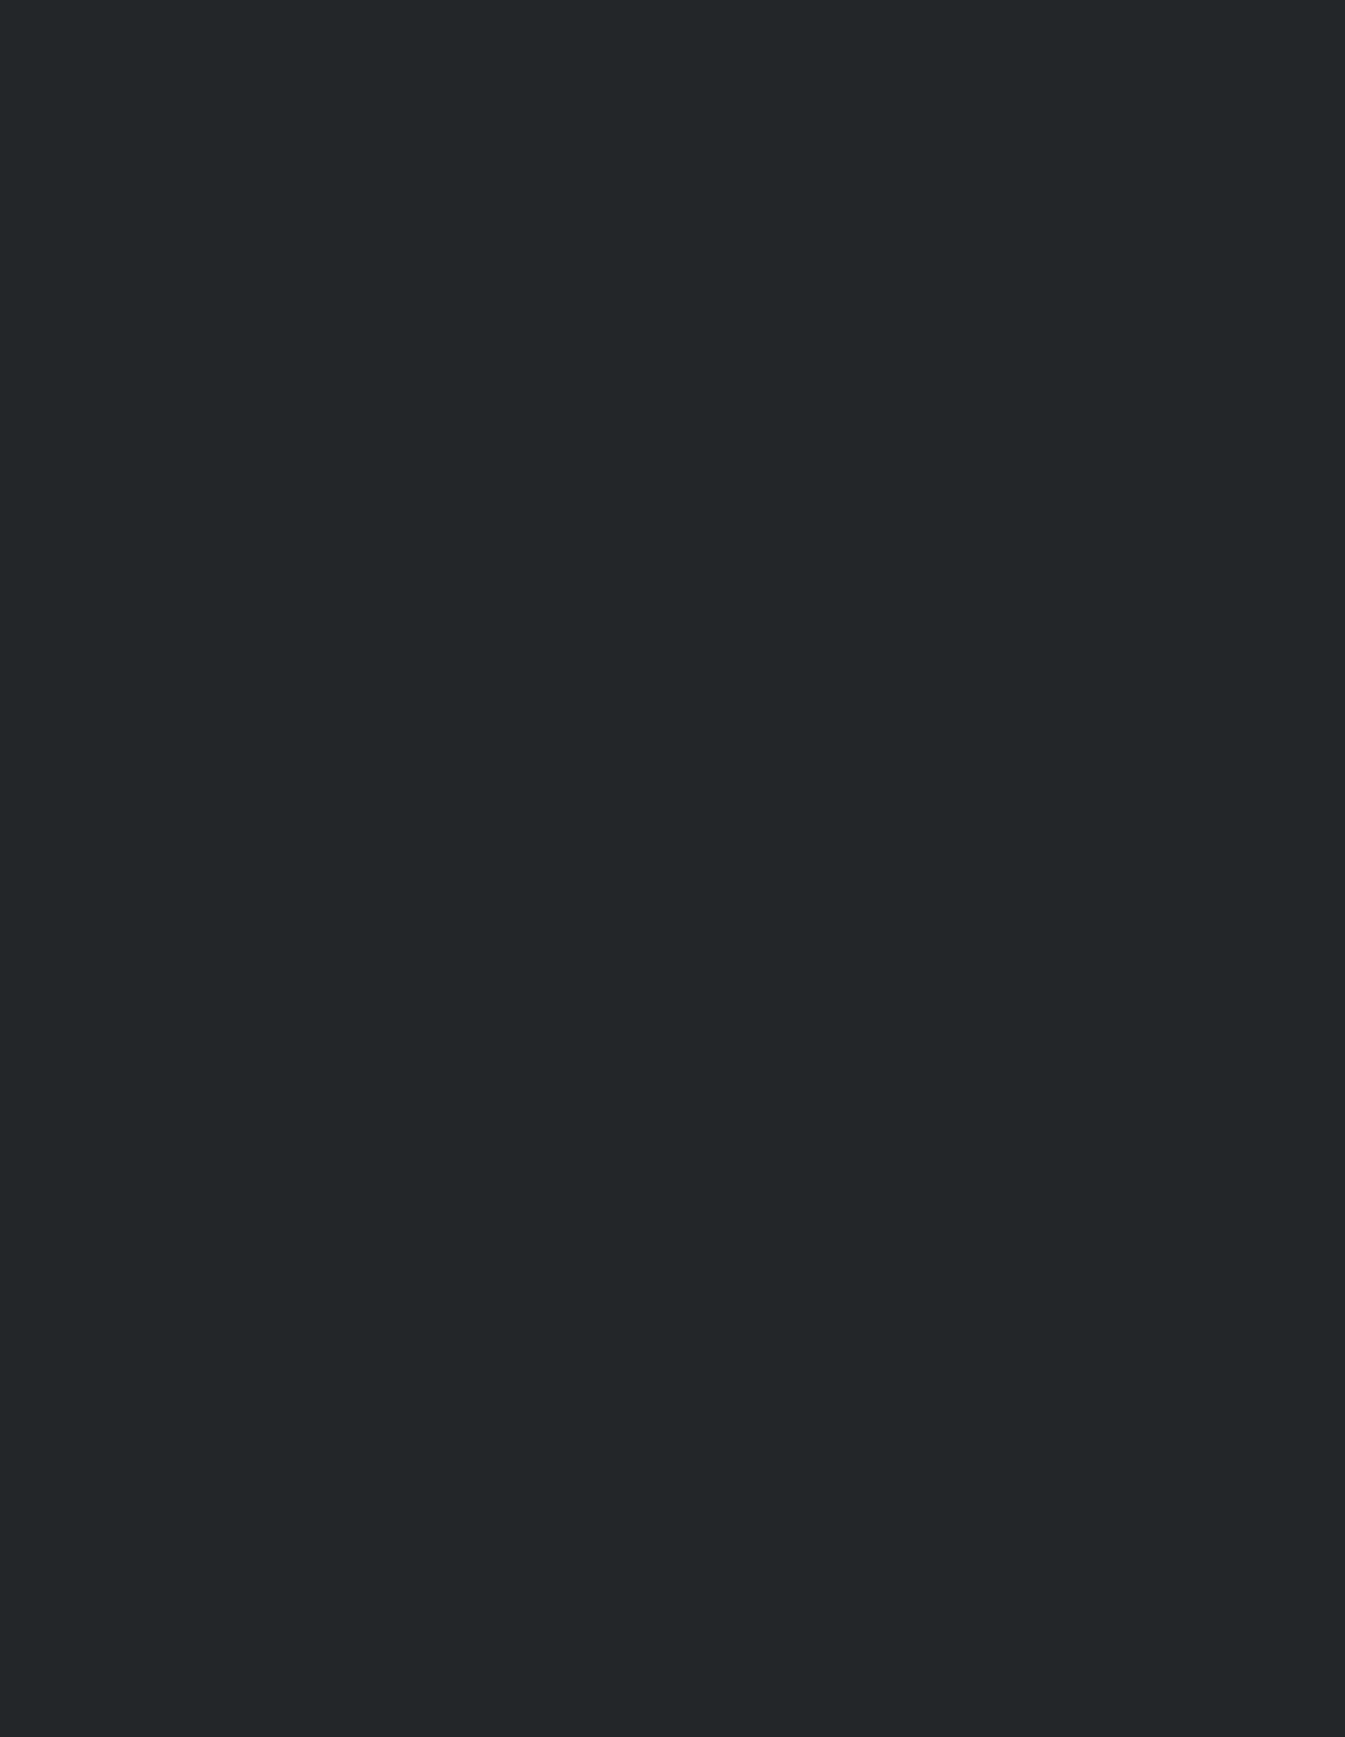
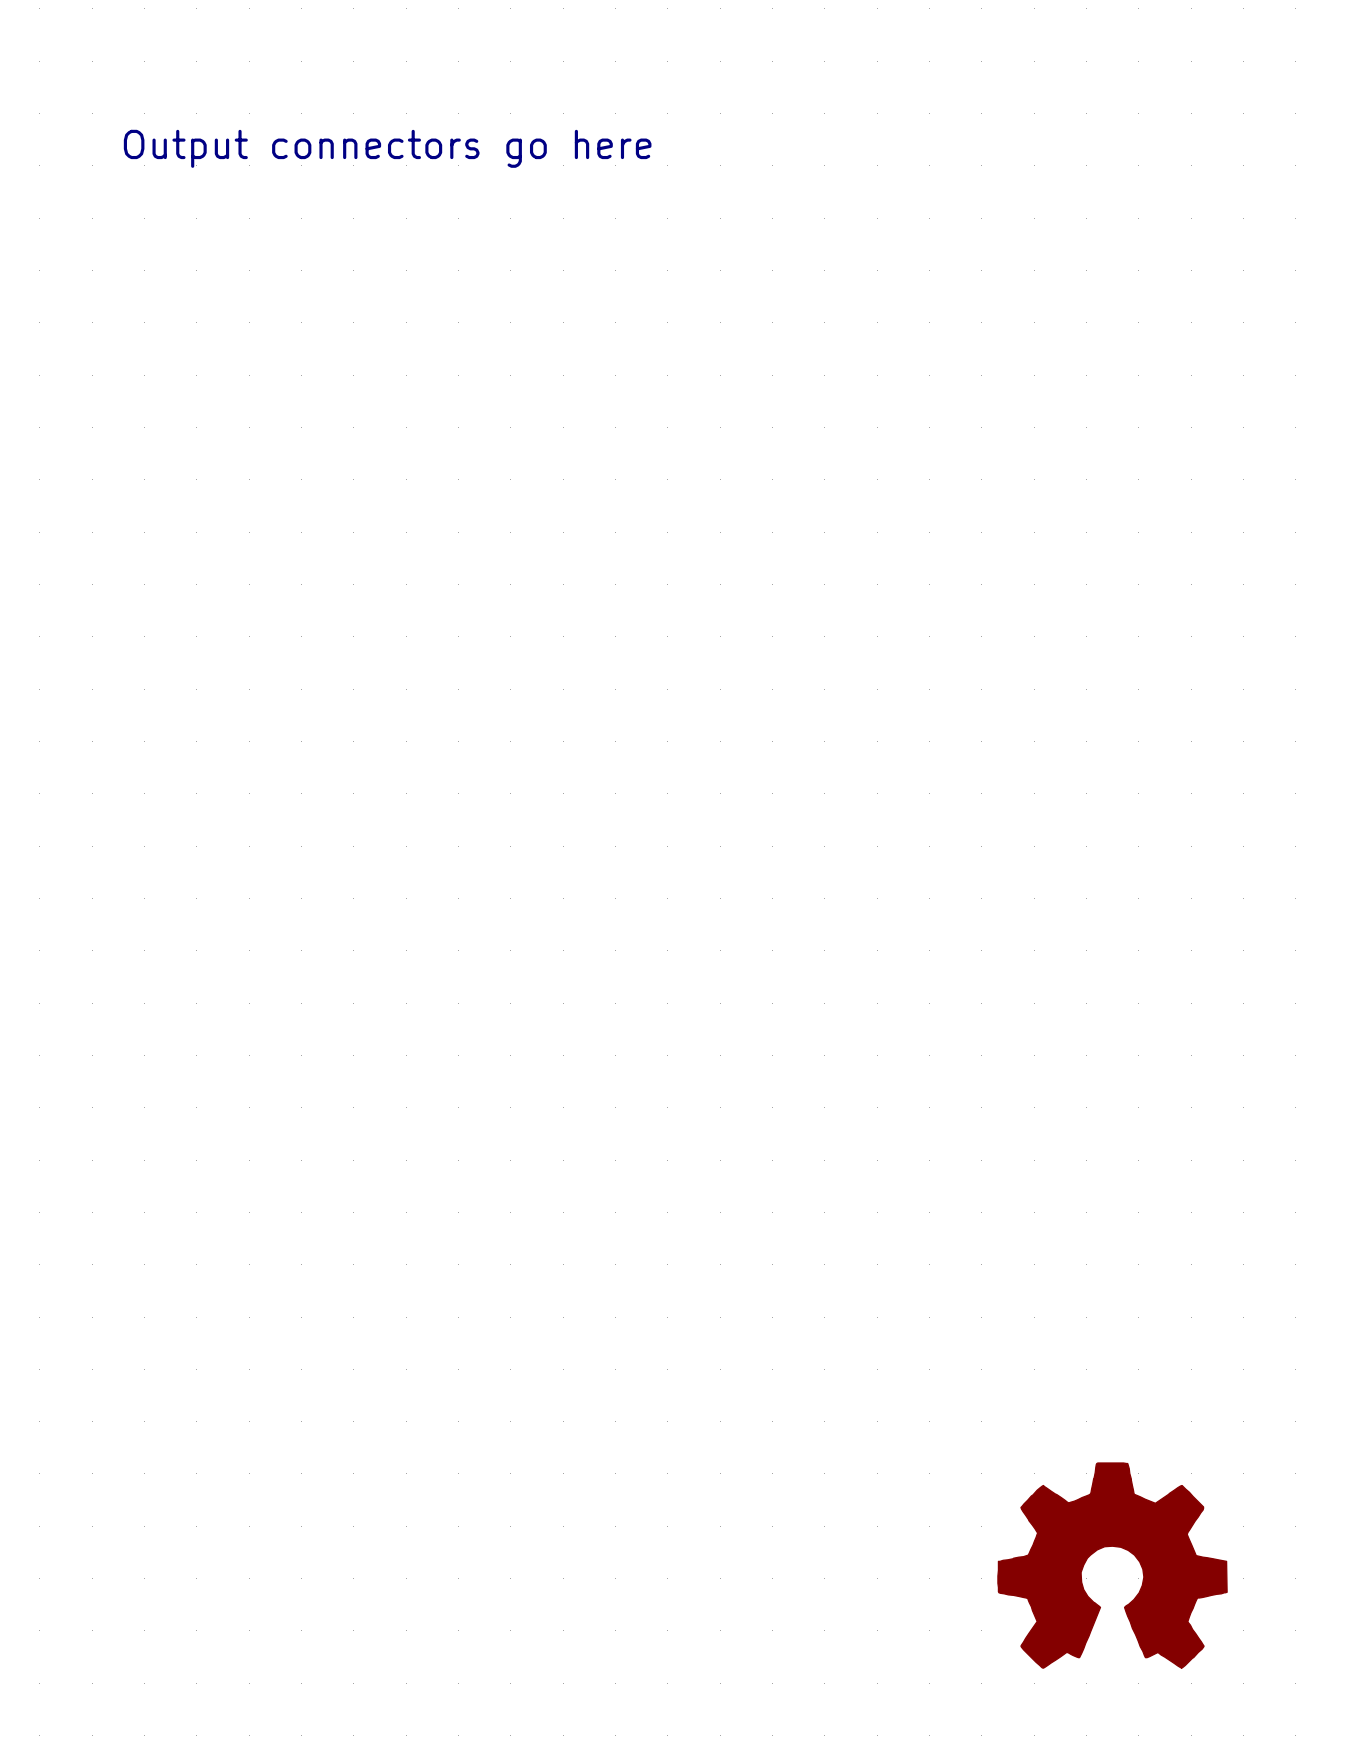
text: none -> Output connectors go here (387, 148)
part: none -> (1112, 1565)

